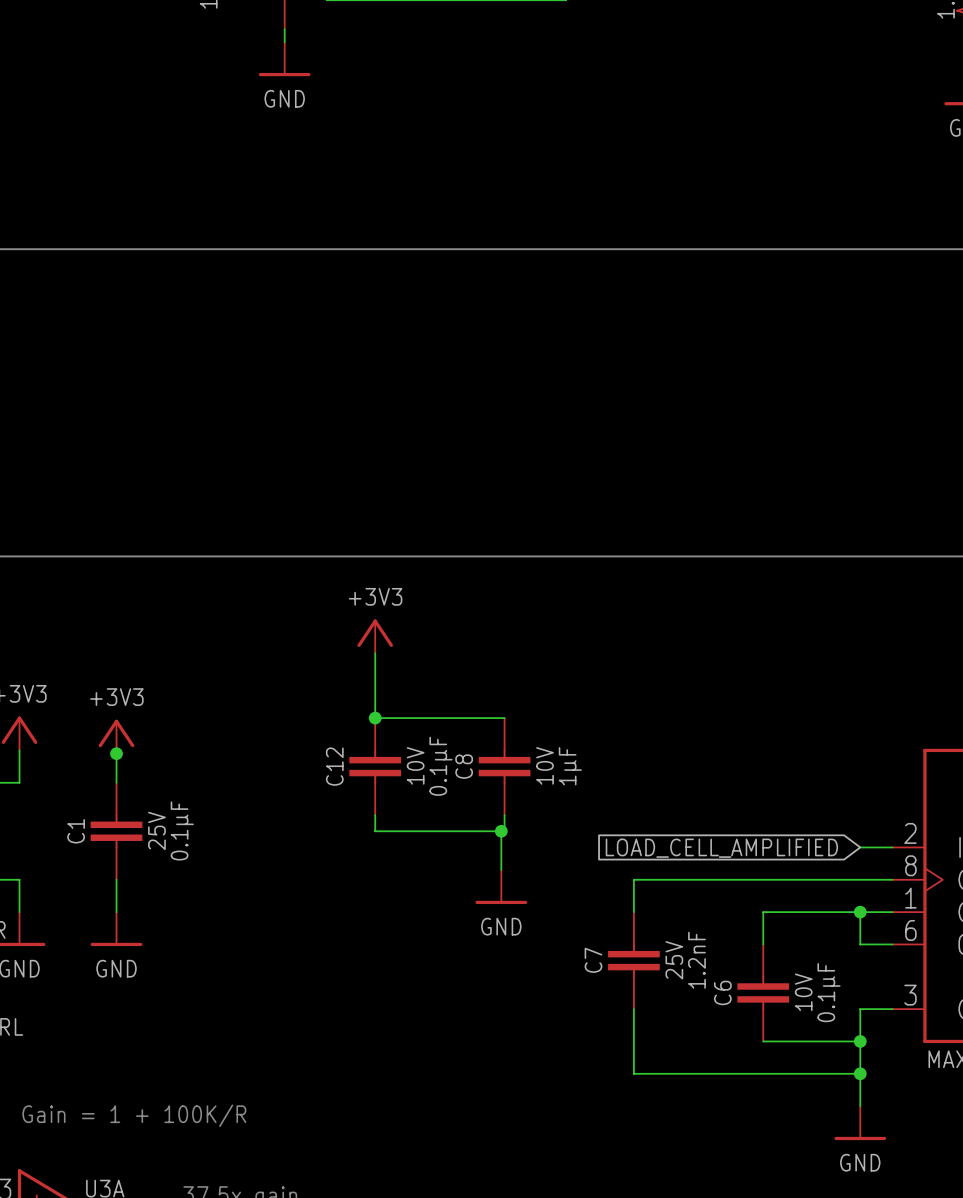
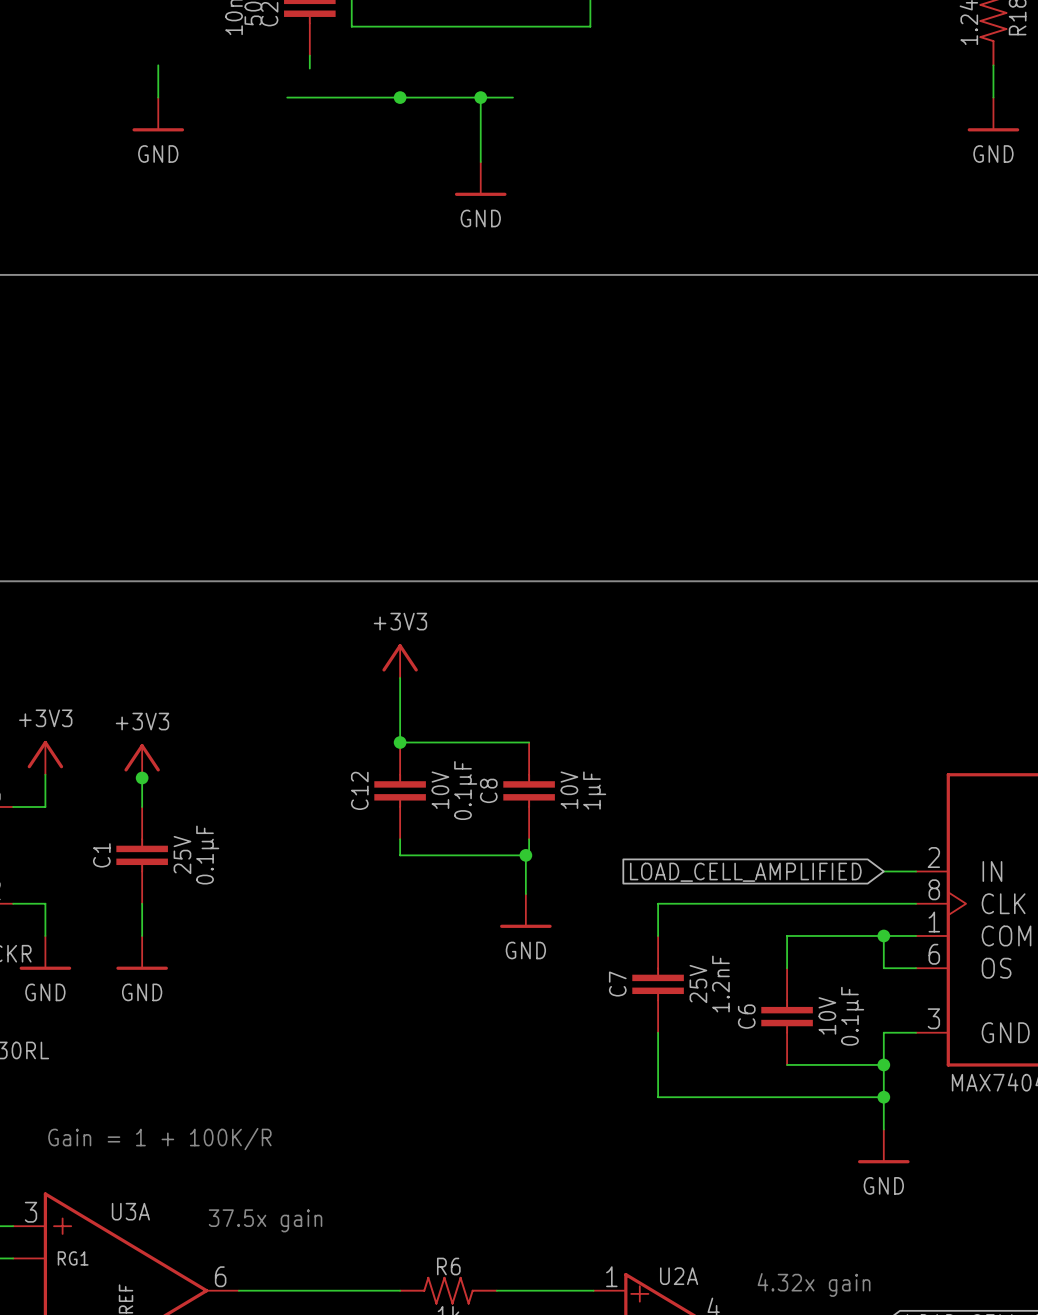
wire: none -> (158, 65) (158, 97)
power symbol: GND (284, 59) -> none
wire: none -> (287, 97) (512, 97)
junction: none -> (400, 97)
wire: none -> (480, 97) (480, 162)
junction: none -> (480, 97)
power symbol: none -> GND (158, 114)
power symbol: none -> GND (480, 178)

